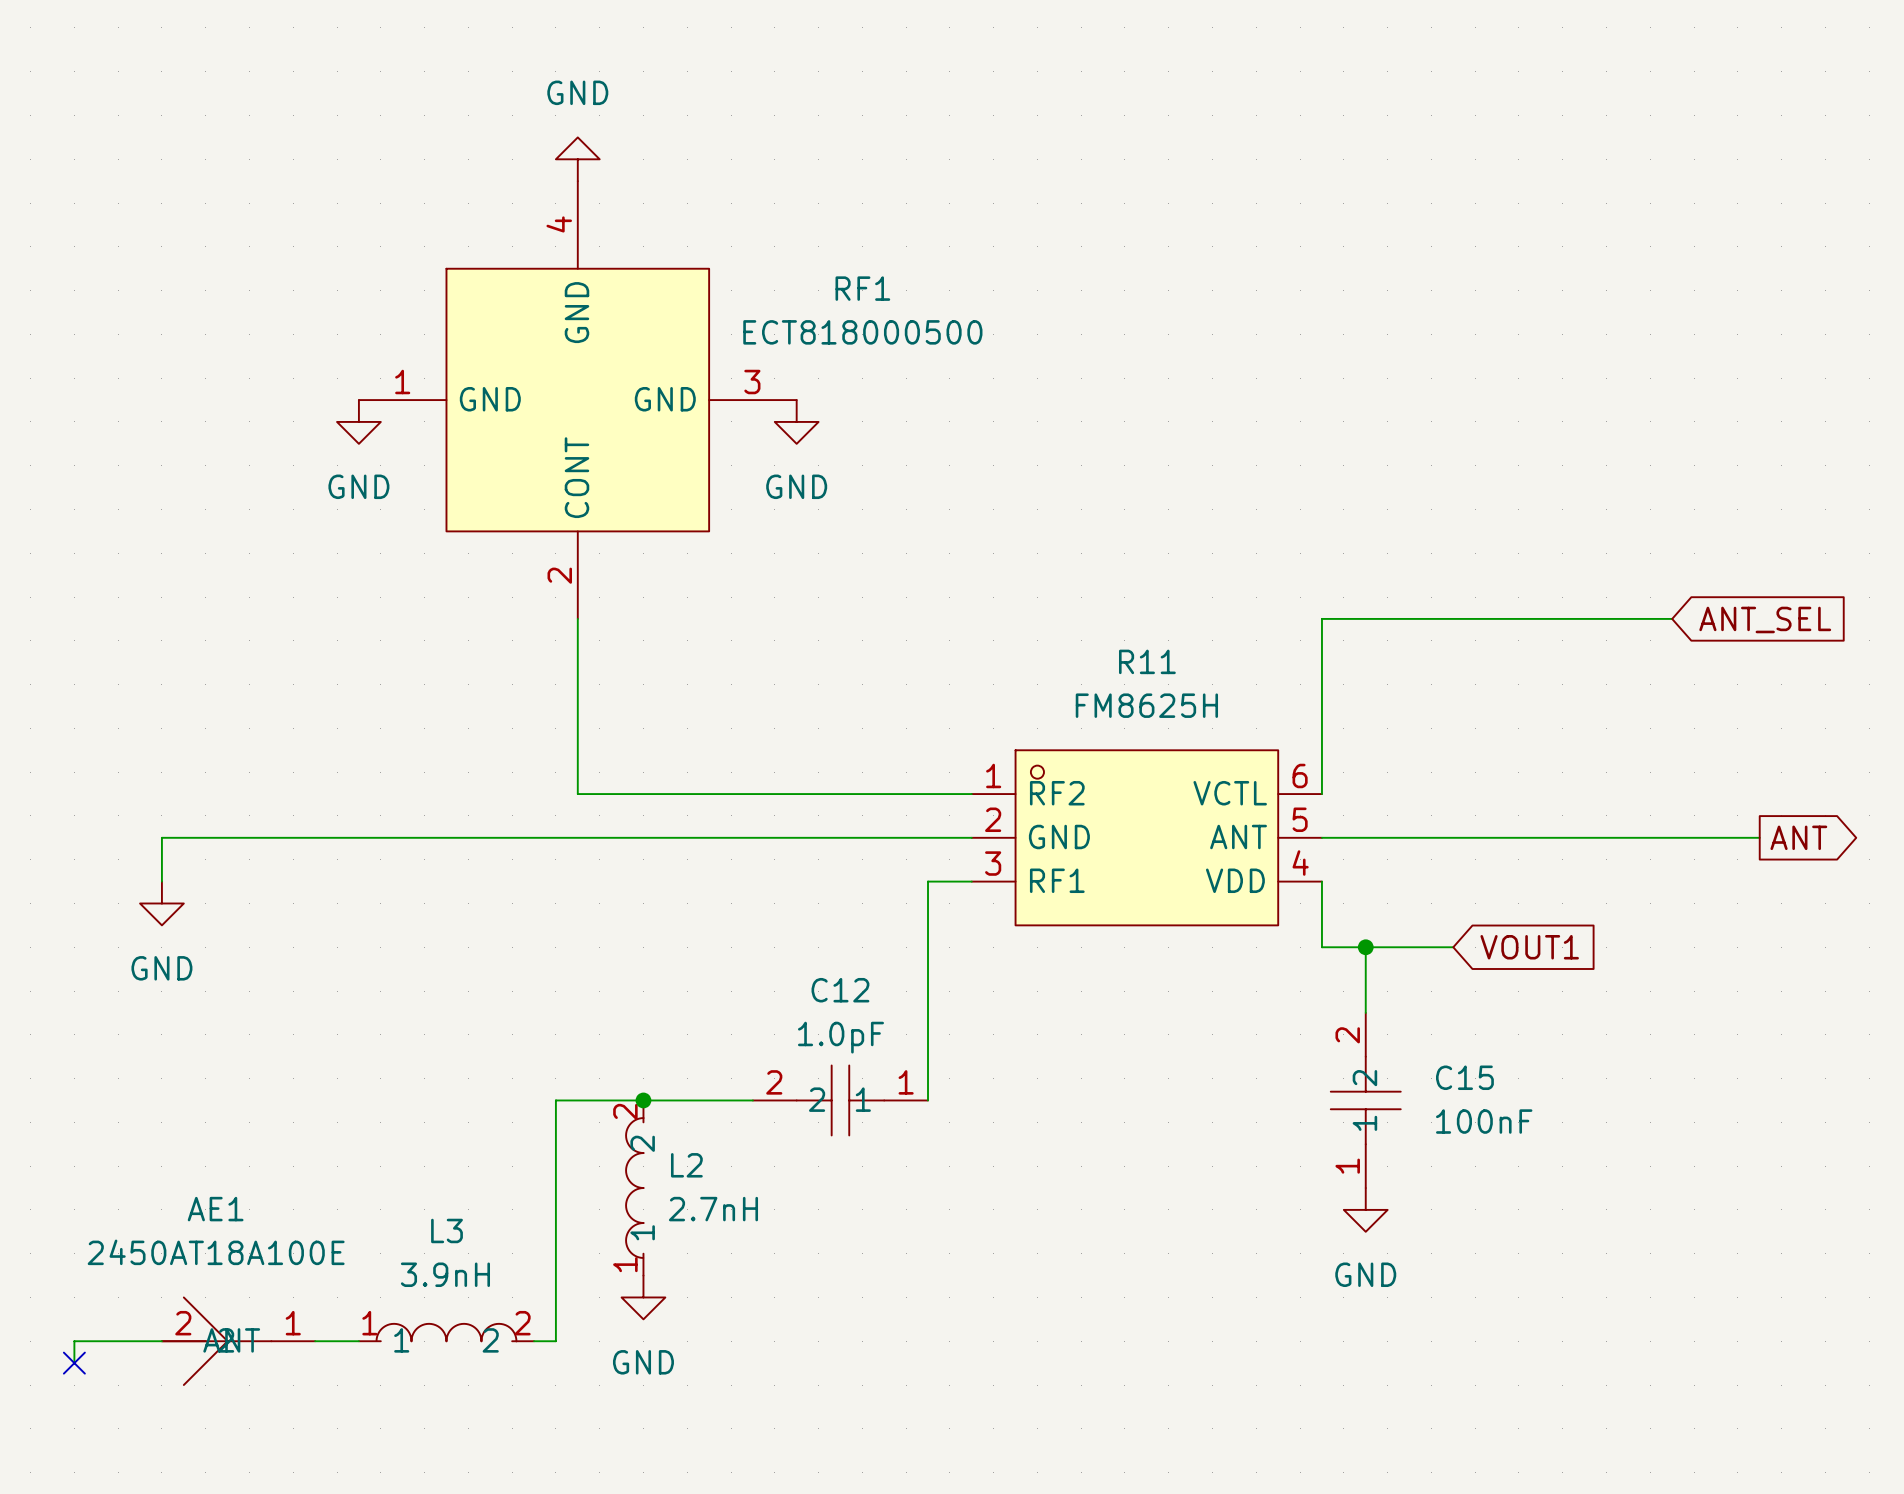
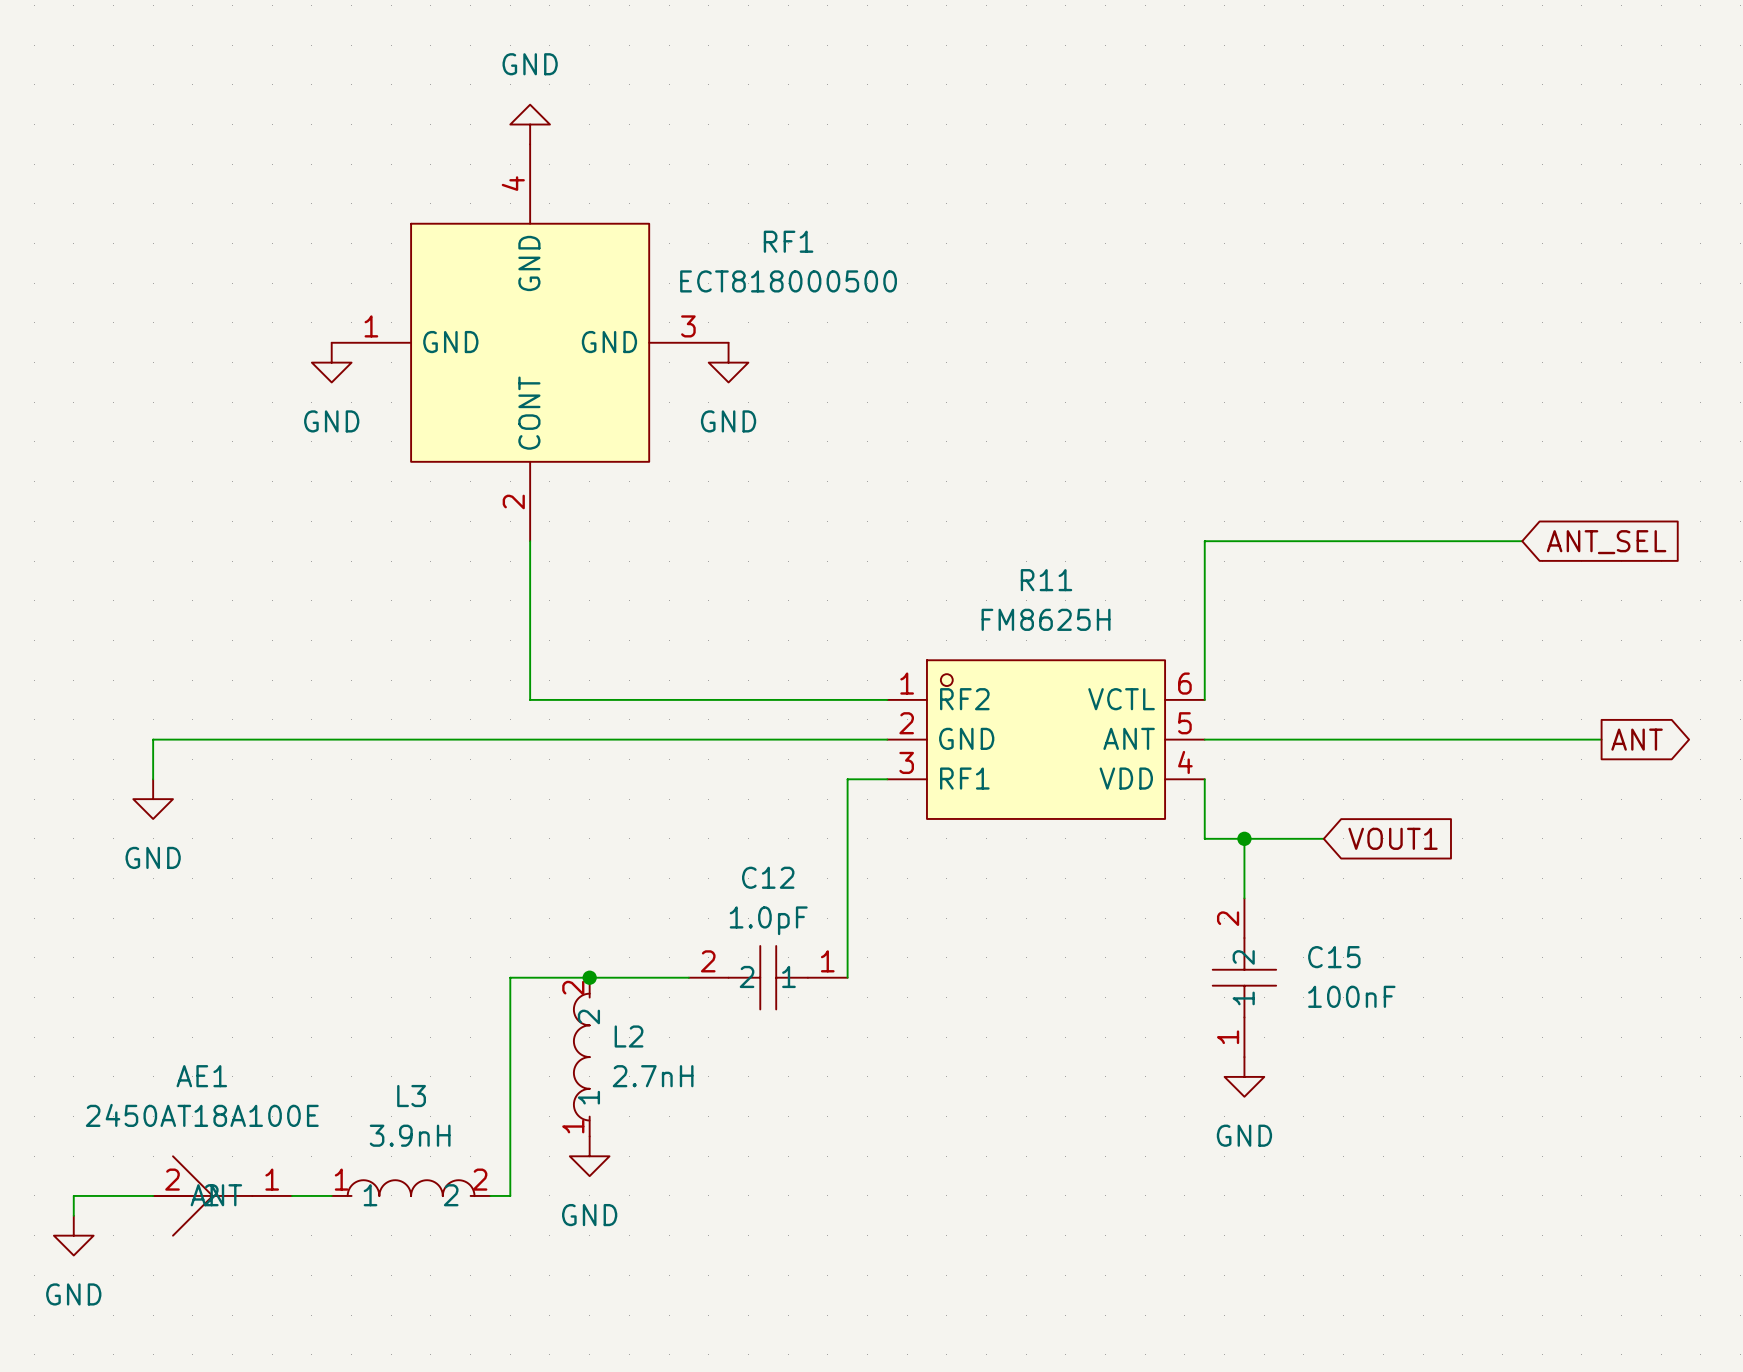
no-connect mark: (74, 1363) -> none
power symbol: none -> GND (73, 1235)

